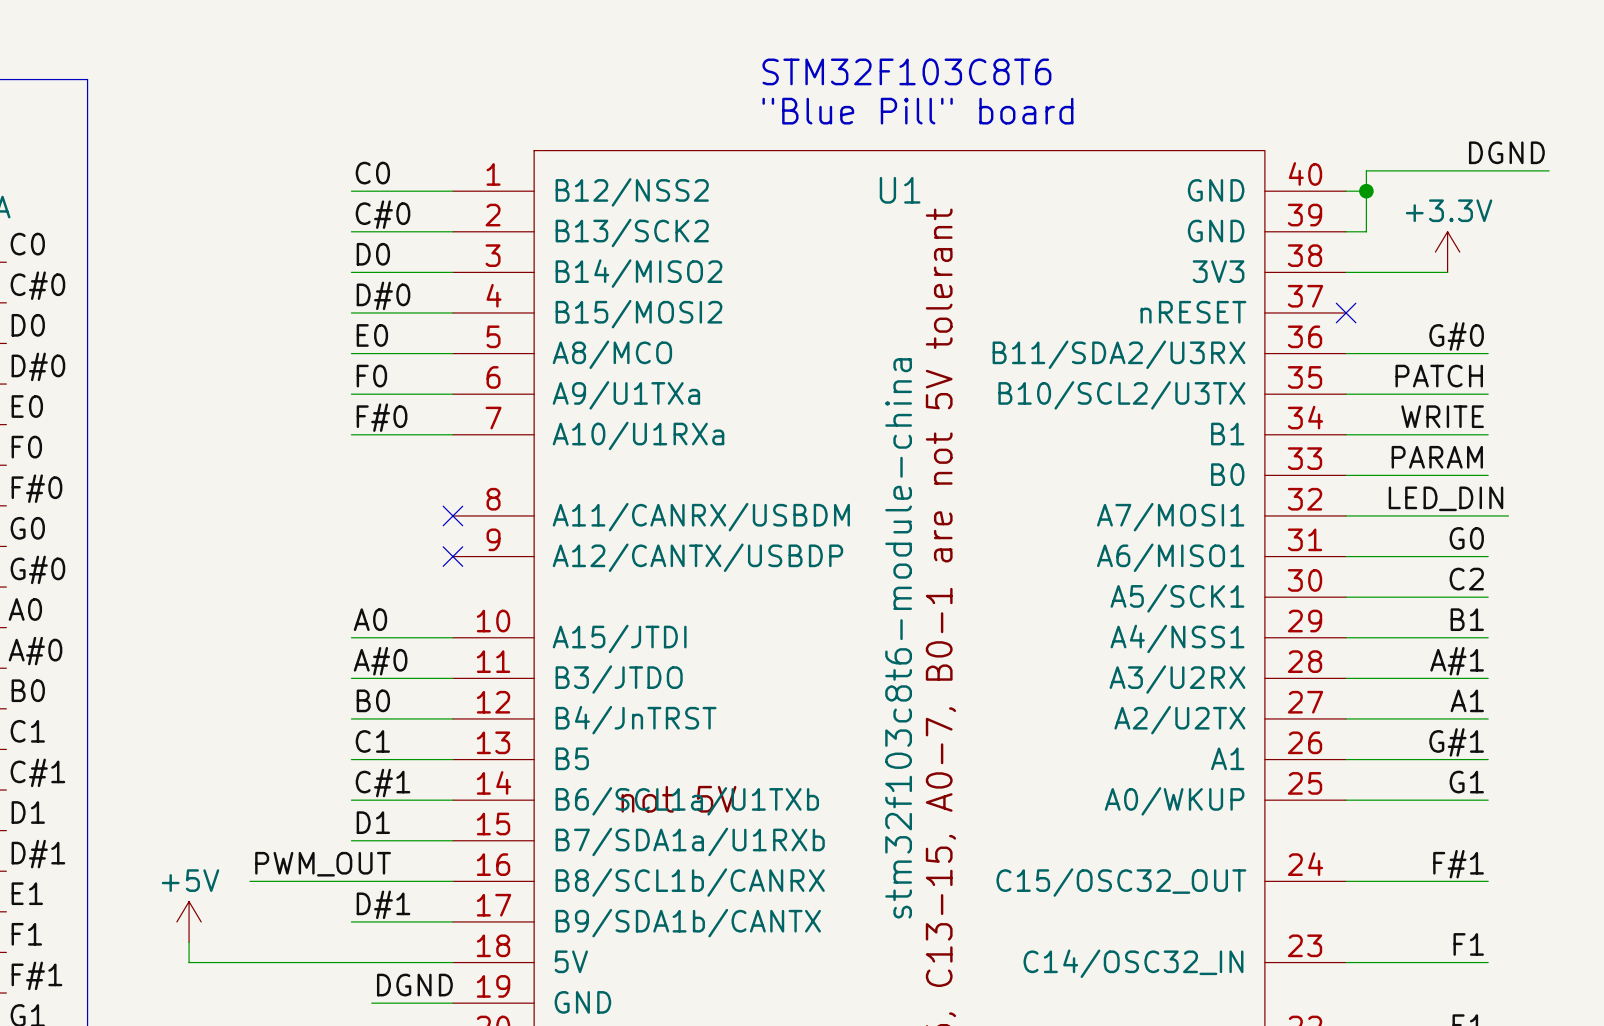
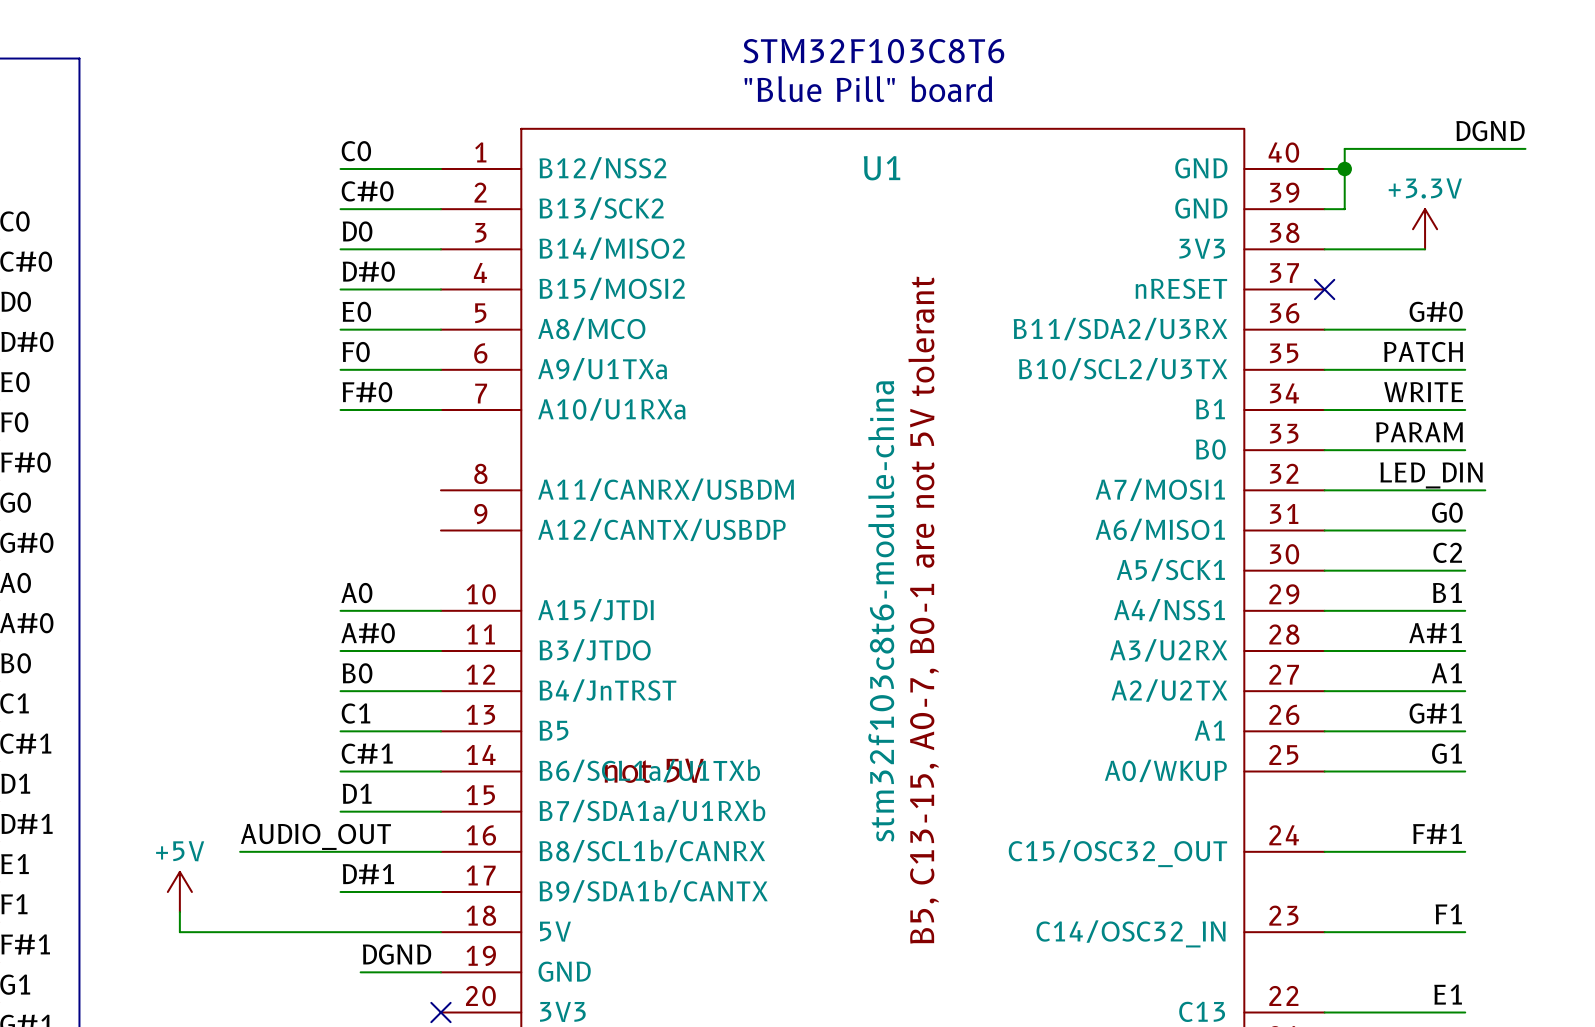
no-connect mark: (452, 515) -> none
no-connect mark: (452, 556) -> none
label: PWM_OUT (323, 864) -> AUDIO_OUT (315, 836)

